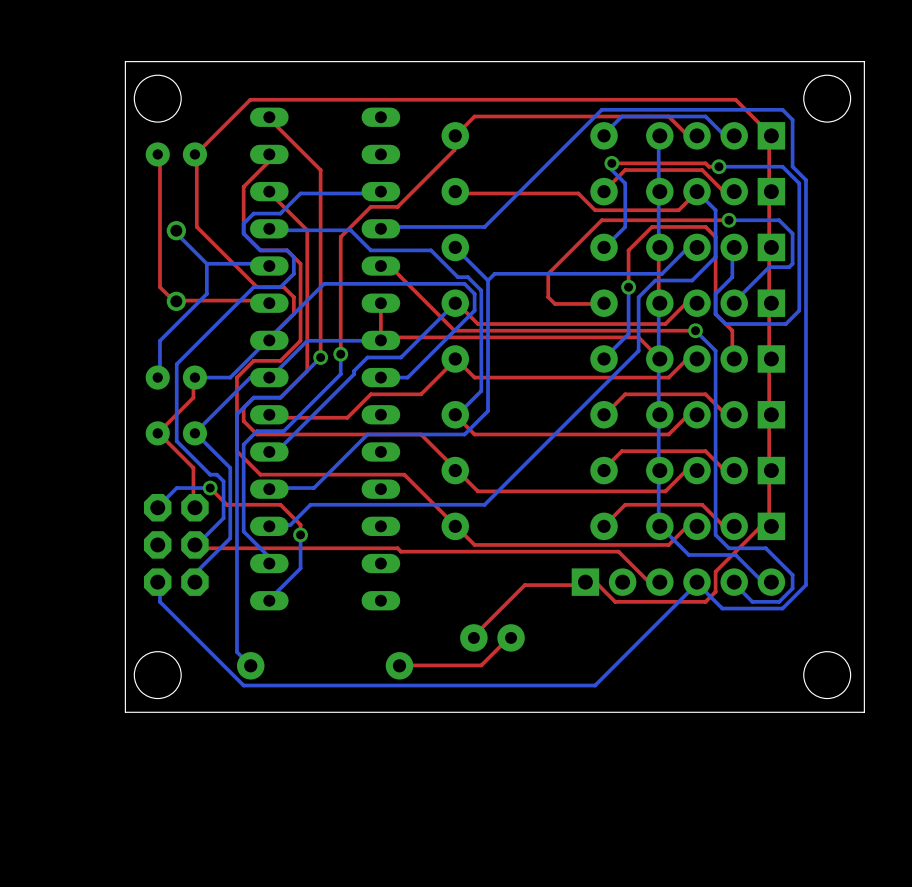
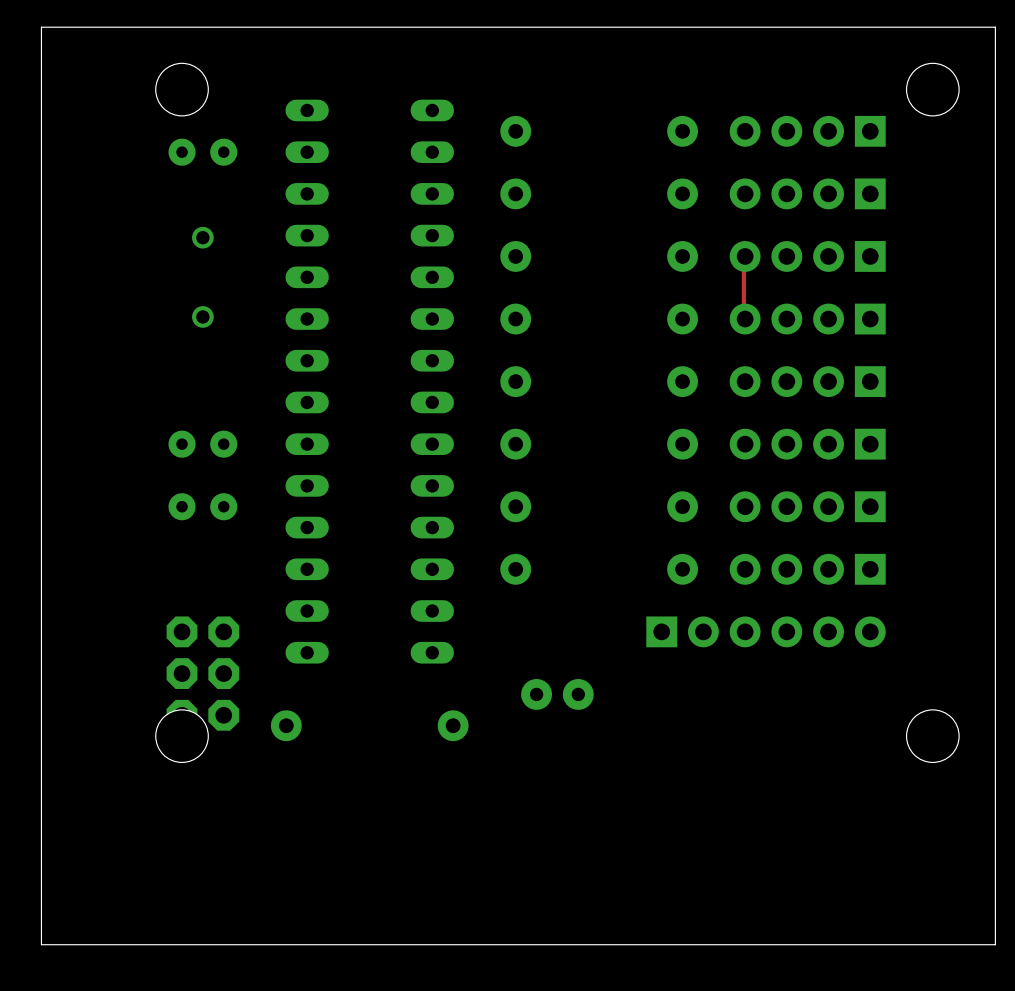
board edge: (864, 61) (125, 61) (125, 712) (864, 712) (864, 61) -> (995, 27) (995, 944) (41, 944) (41, 27) (995, 27)
top track: (269, 117) (320, 170) (320, 357) -> none
bottom track: (659, 135) (659, 247) -> none
top track: (697, 135) (695, 133) (685, 133) (668, 116) (474, 116) (454, 136) (454, 149) (397, 206) (370, 206) (340, 237) (340, 354) -> none
bottom track: (734, 135) (732, 133) (722, 133) (705, 116) (621, 116) (604, 135) -> none
top track: (157, 154) (159, 156) (159, 287) (176, 301) (267, 300) (269, 303) -> none
top track: (269, 154) (267, 156) (267, 163) (243, 186) (243, 233) (260, 250) (287, 250) (300, 263) (300, 340) (280, 360) (253, 360) (236, 377) (236, 451) (260, 474) (404, 474) (474, 544) (668, 544) (685, 528) (695, 528) (697, 526) -> none
top track: (611, 163) (705, 163) (708, 166) (718, 166) -> none
bottom track: (611, 163) (611, 170) (625, 183) (625, 226) (604, 247) -> none
via: (611, 163) -> none
bottom track: (718, 166) (782, 166) (799, 183) (799, 310) (785, 324) (725, 324) (715, 313) (715, 293) (732, 277) (732, 250) (734, 247) -> none
via: (718, 166) -> none
top track: (269, 191) (307, 230) (307, 370) (280, 397) (253, 397) (243, 407) (243, 421) (257, 434) (421, 434) (477, 491) (665, 491) (685, 471) (697, 470) -> none
bottom track: (380, 191) (380, 193) (300, 193) (280, 213) (253, 213) (243, 223) (243, 233) (260, 250) (287, 250) (293, 257) (293, 273) (280, 287) (253, 287) (176, 364) (176, 441) (210, 474) (216, 474) (223, 481) (223, 518) (194, 544) -> none
top track: (697, 191) (678, 210) (595, 210) (578, 193) (457, 193) (455, 191) -> none
bottom track: (697, 191) (715, 210) (715, 257) (692, 280) (655, 280) (638, 297) (638, 350) (484, 504) (310, 504) (290, 524) (269, 526) -> none
top track: (734, 191) (722, 190) (702, 170) (625, 170) (604, 191) -> none
top track: (729, 220) (601, 220) (548, 273) (548, 297) (554, 303) (604, 303) -> none
bottom track: (729, 220) (779, 220) (792, 233) (792, 263) (789, 267) (769, 267) (734, 303) -> none
via: (729, 220) -> none
bottom track: (269, 228) (350, 230) (370, 250) (431, 250) (457, 277) (467, 277) (481, 290) (481, 390) (455, 414) -> none
bottom track: (380, 228) (380, 226) (484, 226) (601, 109) (782, 109) (792, 119) (792, 166) (805, 180) (805, 585) (782, 608) (722, 608) (697, 582) (595, 685) (243, 685) (159, 601) (159, 585) (157, 582) -> none
bottom track: (176, 230) (176, 233) (206, 263) -> none
bottom track: (455, 247) (488, 280) -> none
bottom track: (697, 247) (695, 250) (685, 250) (662, 273) (494, 273) (488, 280) -> none
bottom track: (206, 263) (267, 263) (269, 266) -> none
bottom track: (206, 263) (206, 293) (159, 340) (159, 377) (157, 377) -> none
top track: (380, 266) (390, 267) (454, 330) (695, 330) -> none
bottom track: (488, 280) (488, 411) (464, 434) (367, 434) (313, 488) (269, 489) -> none
top track: (628, 287) (628, 250) (652, 226) (705, 226) (715, 237) (715, 313) (732, 330) (732, 357) (734, 358) -> none
bottom track: (628, 287) (628, 334) (604, 358) -> none
via: (628, 287) -> none
top track: (380, 303) (380, 340) -> none
bottom track: (455, 303) (400, 357) (367, 357) (354, 370) (354, 374) (277, 451) (269, 451) -> none
bottom track: (659, 303) (658, 524) (688, 554) (735, 554) (762, 581) (771, 582) -> none
top track: (697, 303) (685, 303) (665, 324) (477, 324) (455, 303) -> none
bottom track: (695, 330) (715, 350) (715, 534) (729, 548) (765, 548) (792, 575) (792, 588) (779, 601) (752, 601) (734, 582) -> none
via: (695, 330) -> none
top track: (380, 337) (638, 337) (659, 358) -> none
top track: (269, 340) (293, 313) (293, 297) (283, 287) (257, 287) (196, 226) (196, 156) (194, 154) (250, 99) (735, 99) (771, 135) (769, 136) (769, 190) (771, 191) (769, 193) (769, 247) (771, 247) (769, 250) (769, 300) (771, 303) (769, 303) (769, 357) (771, 358) (769, 360) (769, 414) (771, 414) (769, 417) (769, 467) (771, 470) (769, 471) (769, 524) (771, 526) (769, 528) (759, 528) (715, 571) (715, 591) (705, 601) (615, 601) (598, 585) (588, 585) (585, 582) (585, 585) (524, 585) (473, 637) -> none
bottom track: (380, 340) (307, 340) (270, 377) (250, 377) (194, 433) (230, 467) (230, 538) (196, 571) (196, 581) (194, 582) -> none
bottom track: (340, 354) (340, 374) (283, 431) (257, 431) (243, 444) (243, 531) (267, 554) (267, 561) (269, 563) -> none
via: (340, 354) -> none
bottom track: (320, 357) (280, 397) (253, 397) (236, 414) (236, 652) (250, 665) -> none
via: (320, 357) -> none
top track: (697, 358) (695, 360) (685, 360) (668, 377) (474, 377) (455, 358) (421, 394) (370, 394) (347, 417) (270, 417) (269, 414) -> none
part: (176, 377) -> none
top track: (194, 377) (193, 397) (157, 433) (193, 467) (194, 507) -> none
bottom track: (380, 377) (407, 377) (474, 310) (474, 293) (464, 283) (323, 283) (230, 377) (194, 377) -> none
part: none -> (202, 444)
top track: (697, 414) (695, 417) (685, 417) (668, 434) (474, 434) (455, 414) -> none
top track: (734, 414) (725, 414) (705, 394) (625, 394) (604, 414) -> none
part: (176, 433) -> none
part: none -> (202, 506)
top track: (734, 470) (732, 467) (722, 467) (705, 451) (621, 451) (604, 470) -> none
top track: (210, 488) (226, 504) (280, 504) (300, 524) (300, 534) -> none
bottom track: (210, 488) (176, 488) (157, 507) -> none
via: (210, 488) -> none
top track: (734, 526) (722, 524) (702, 504) (625, 504) (604, 526) -> none
bottom track: (300, 534) (300, 568) (269, 600) -> none
via: (300, 534) -> none
part position: (176, 544) -> (202, 673)
top track: (194, 544) (200, 548) (397, 548) (400, 551) (618, 551) (648, 581) (659, 582) -> none
top track: (511, 637) (481, 665) (399, 665) -> none

